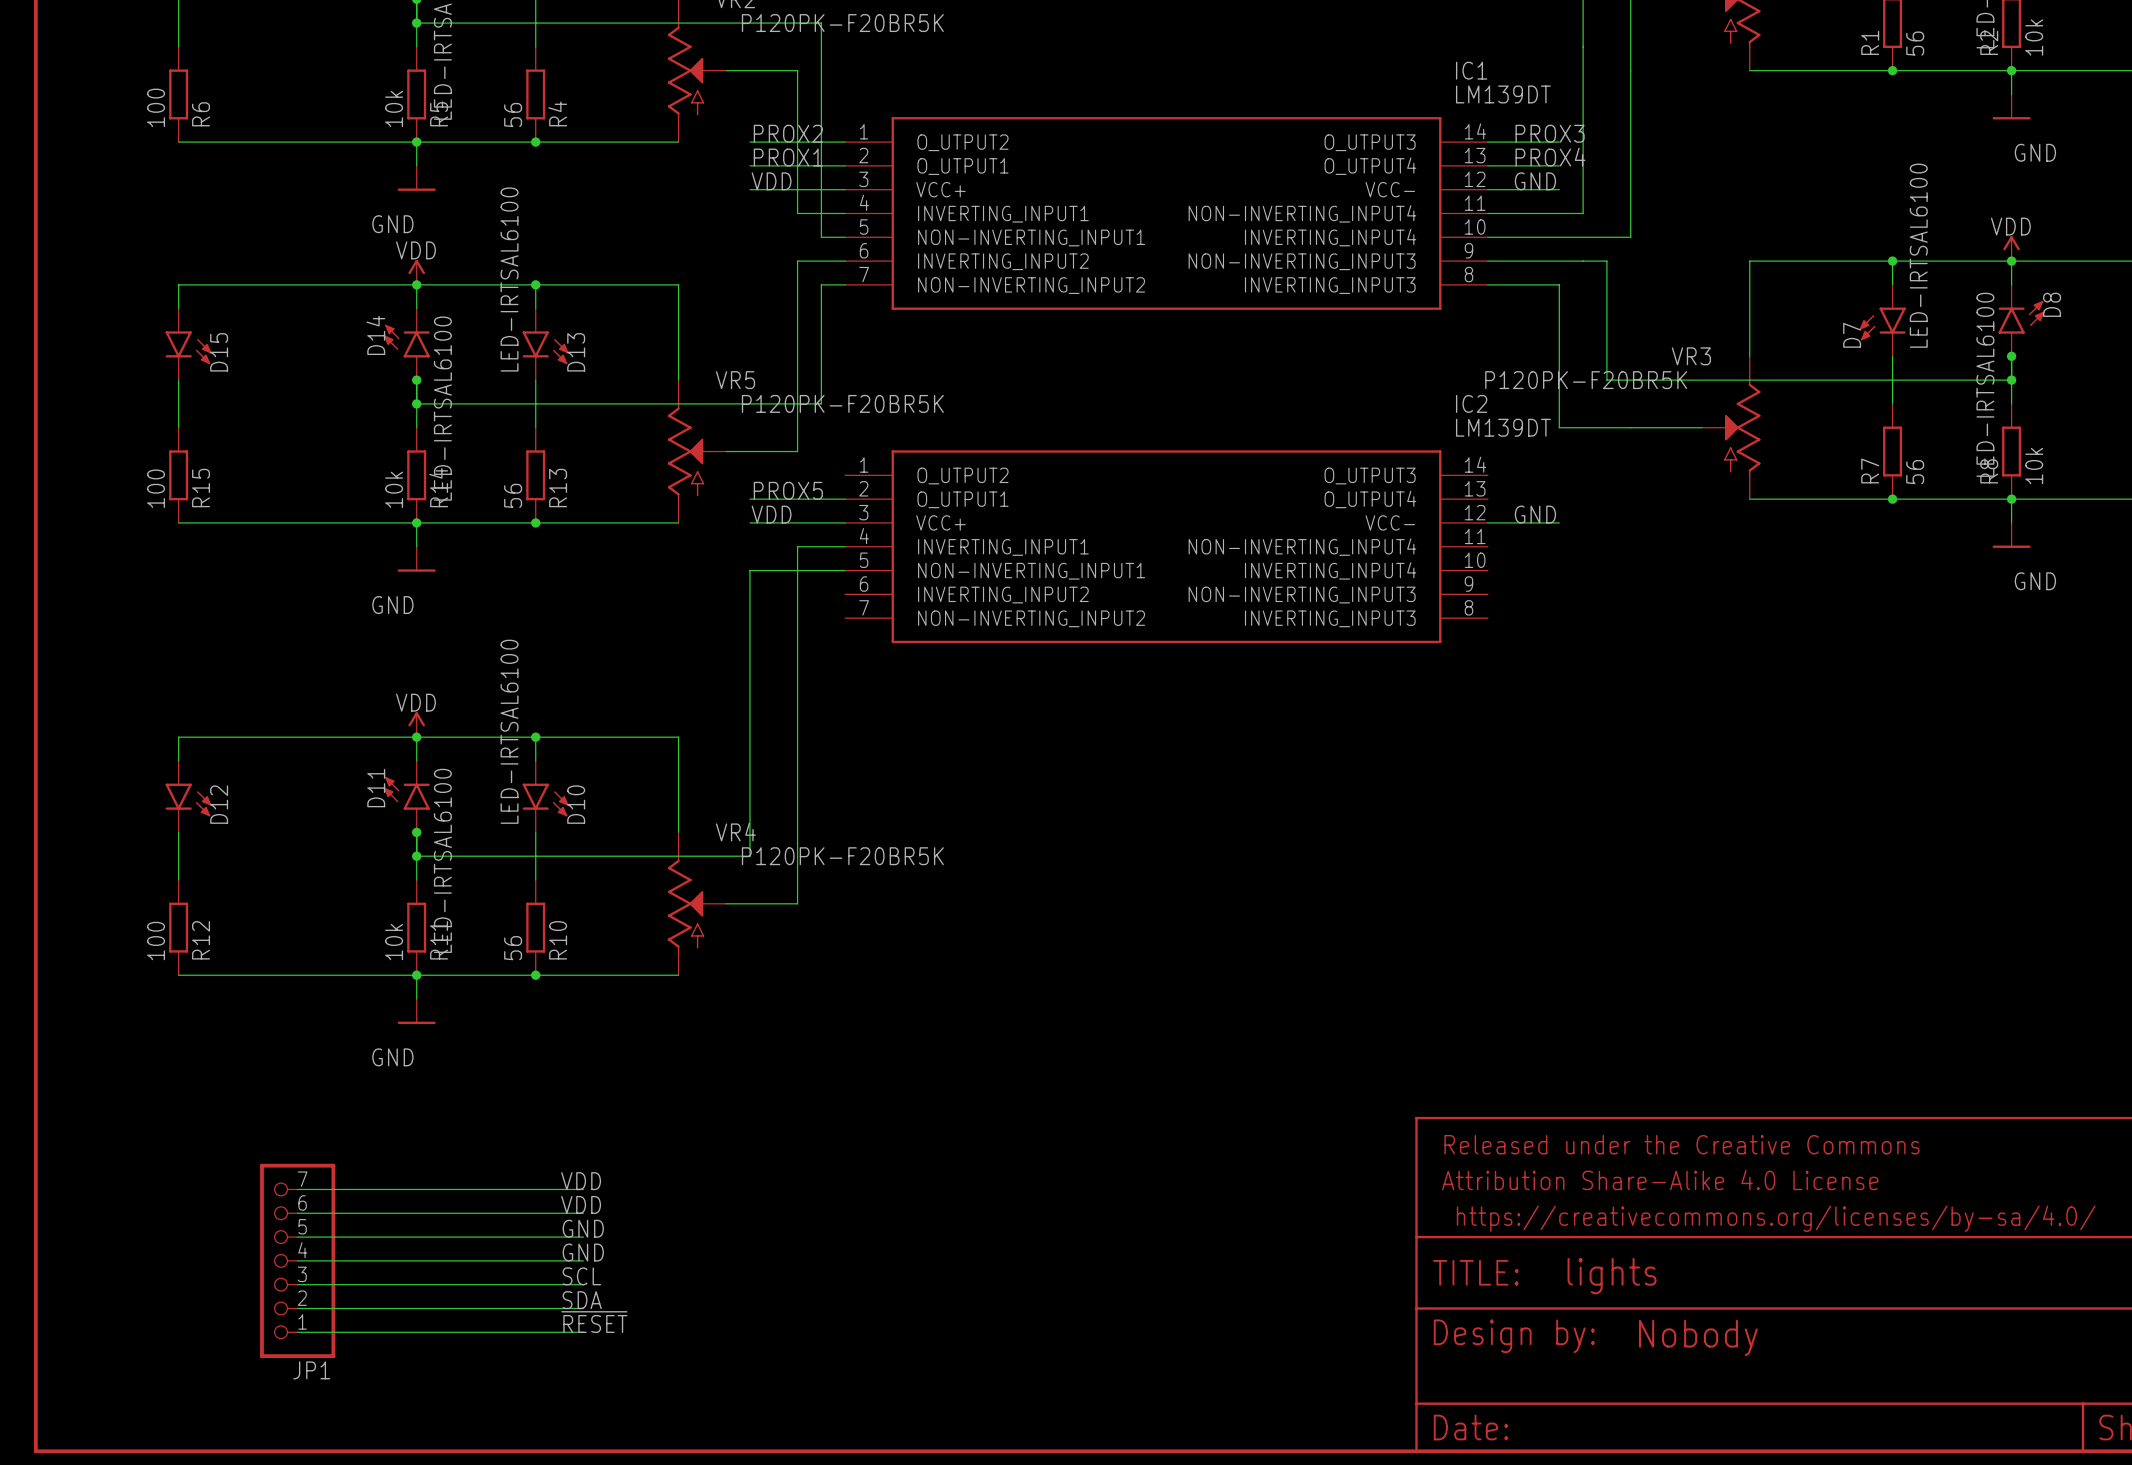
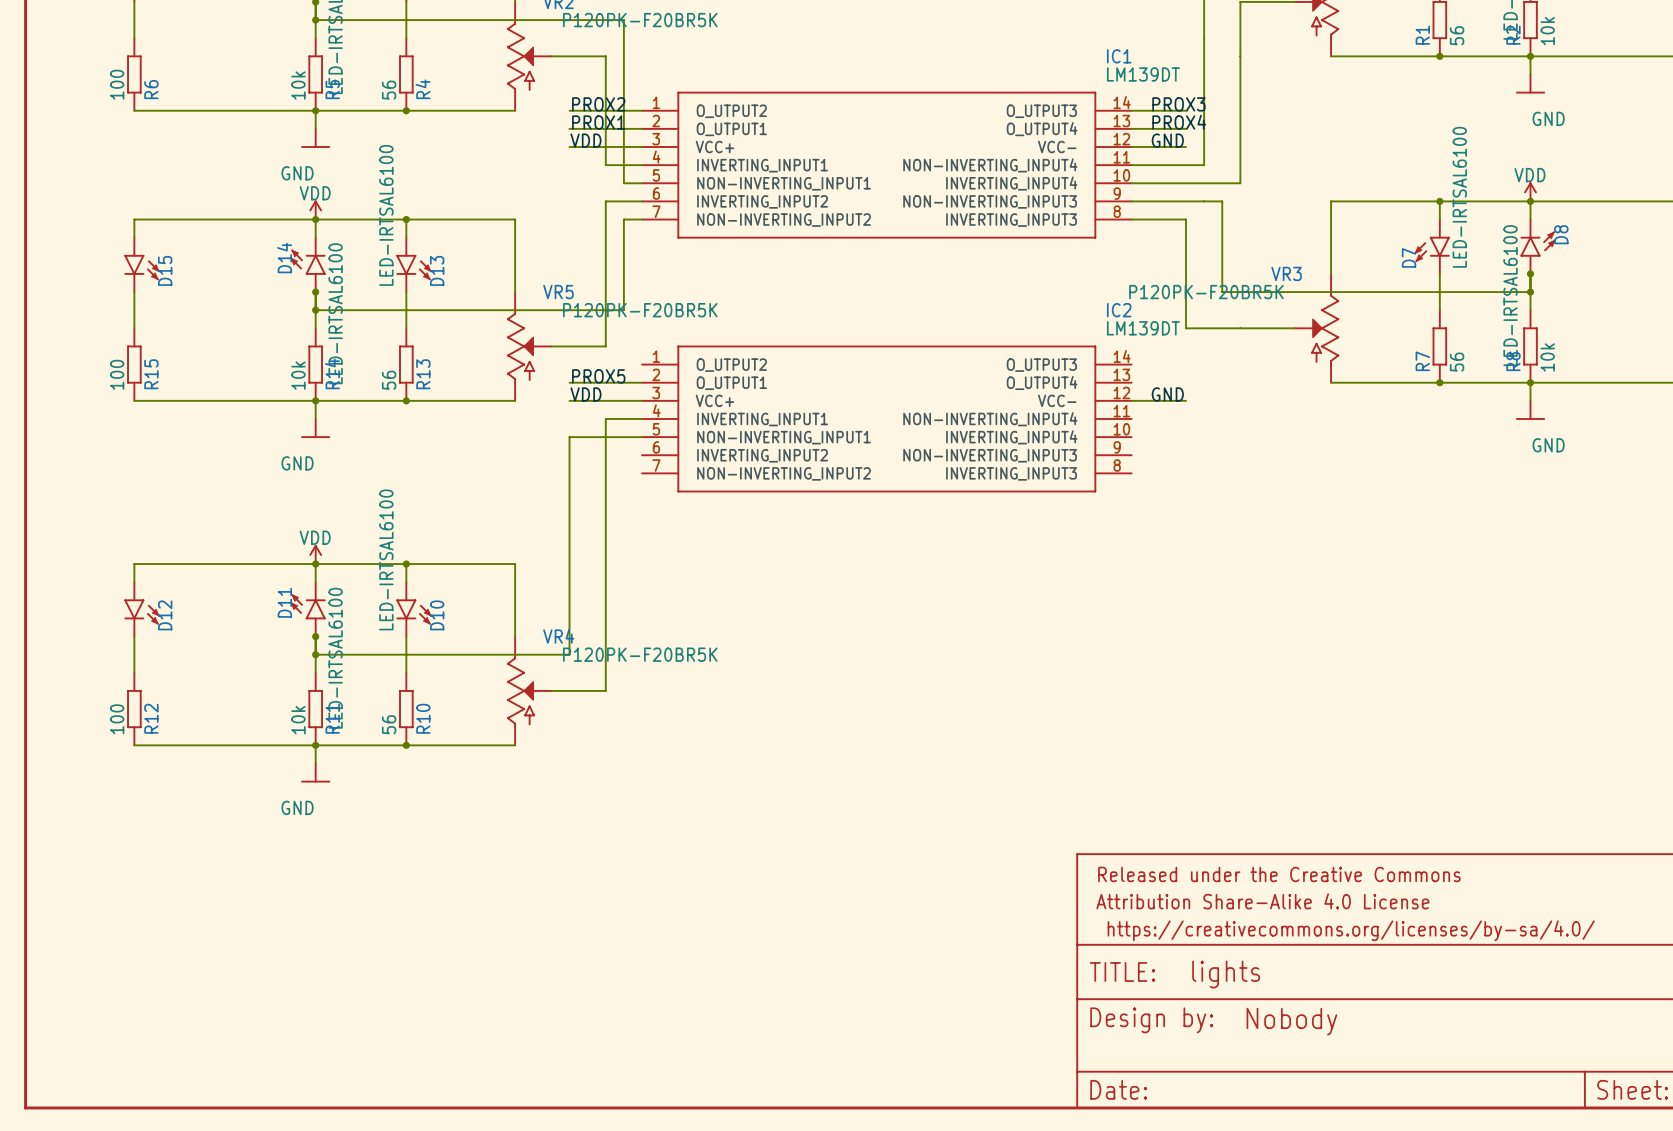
label: VDD (581, 1181) -> none
wire: (297, 1189) (583, 1189) -> none
label: VDD (581, 1204) -> none
wire: (297, 1213) (583, 1213) -> none
label: GND (583, 1228) -> none
wire: (297, 1237) (583, 1237) -> none
label: GND (583, 1252) -> none
wire: (297, 1260) (583, 1260) -> none
JP1: (297, 1260) -> none
label: SCL (581, 1276) -> none
wire: (297, 1284) (583, 1284) -> none
label: SDA (582, 1300) -> none
wire: (297, 1308) (583, 1308) -> none
label: ~{RESET} (594, 1322) -> none
wire: (297, 1332) (583, 1332) -> none

